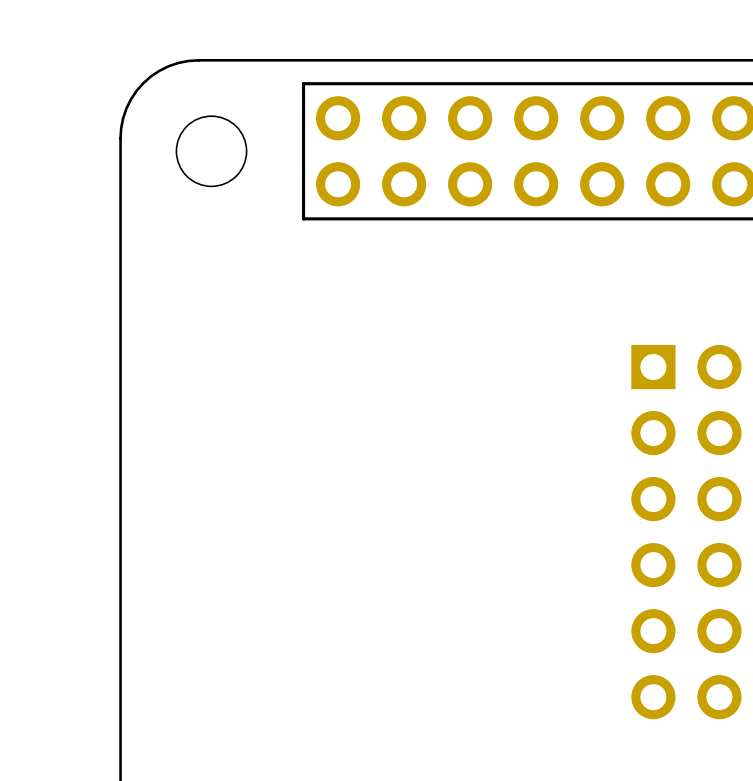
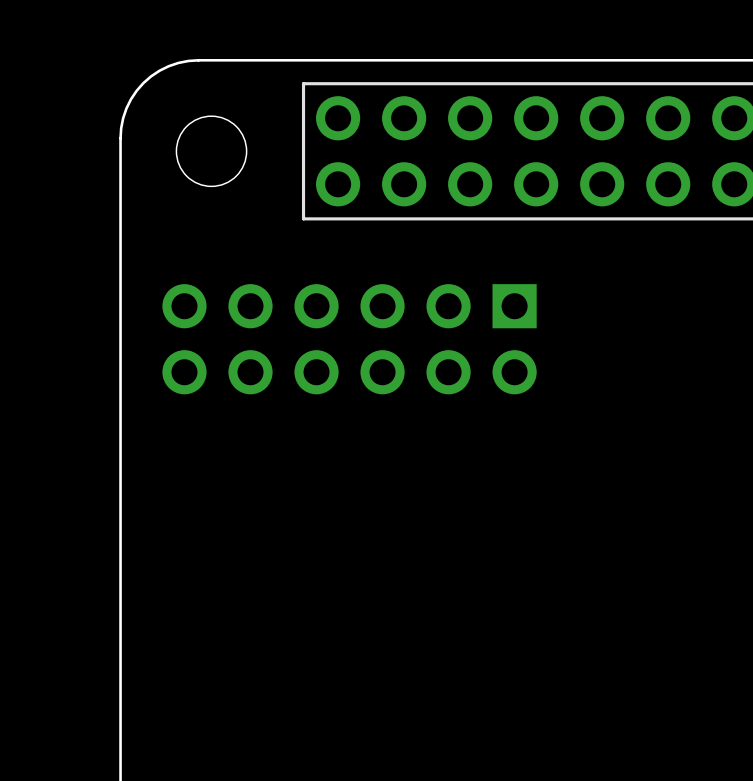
part rotation: 0° (686, 532) -> 90° clockwise (349, 339)
part position: (686, 532) -> (349, 339)

